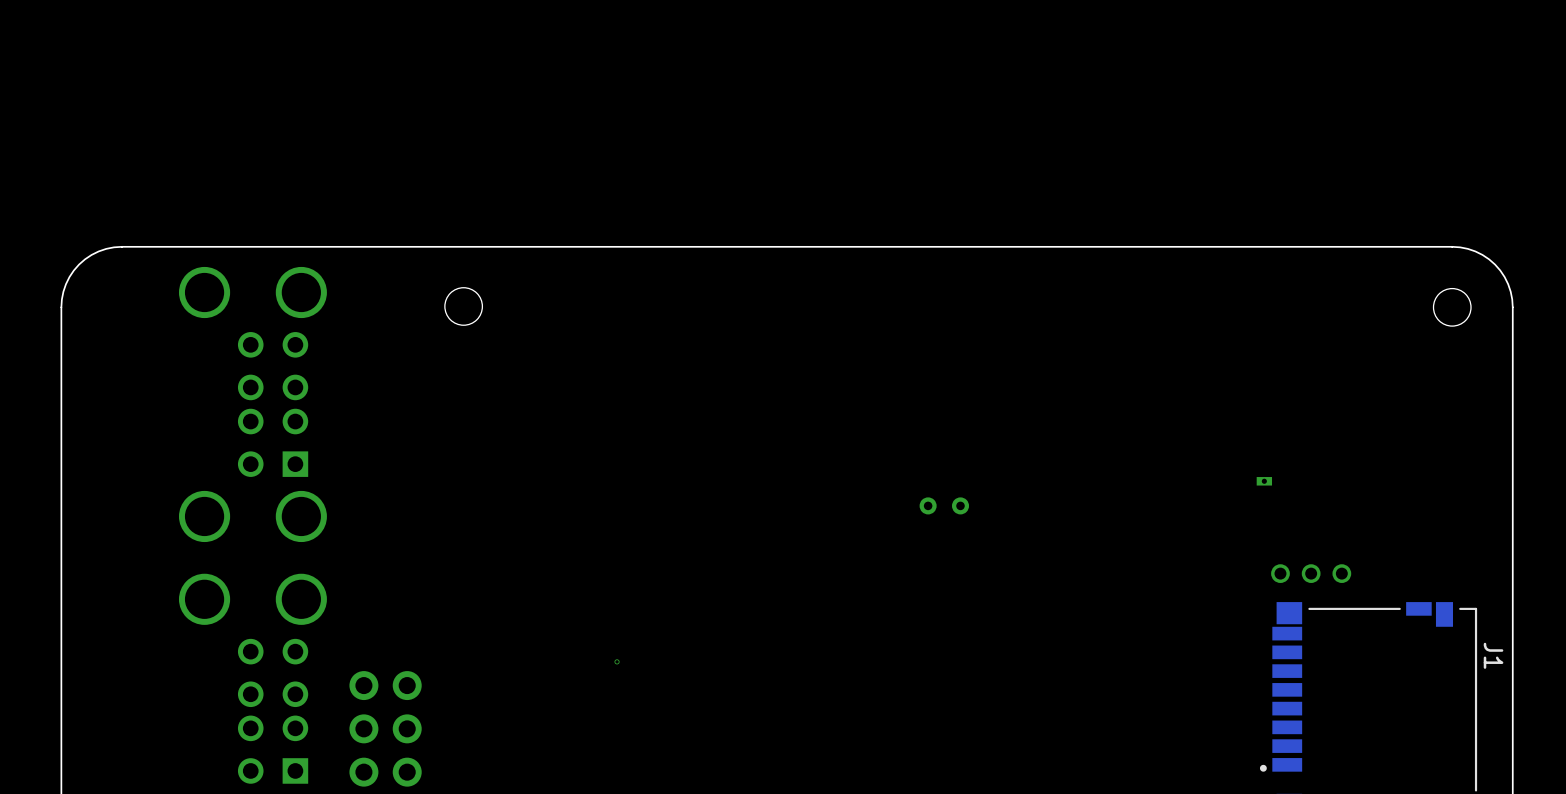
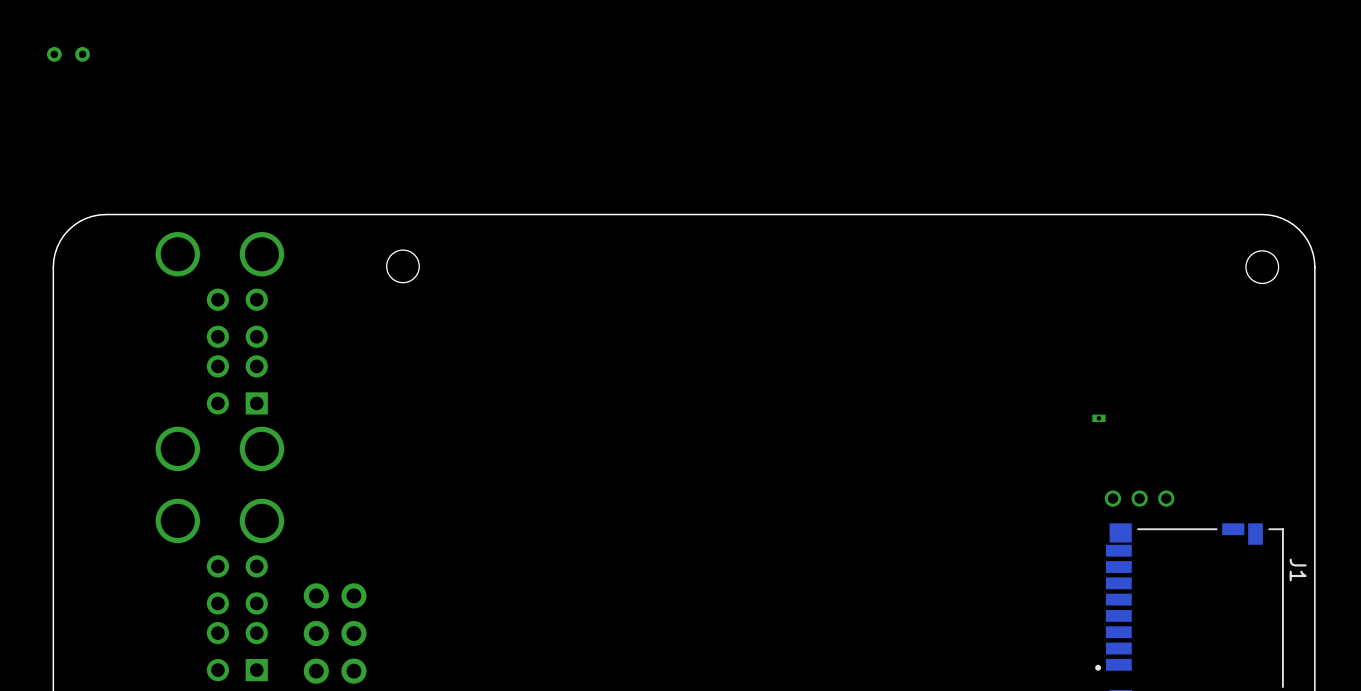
part: none -> (68, 54)
part: (944, 505) -> none
via: (617, 661) -> none

